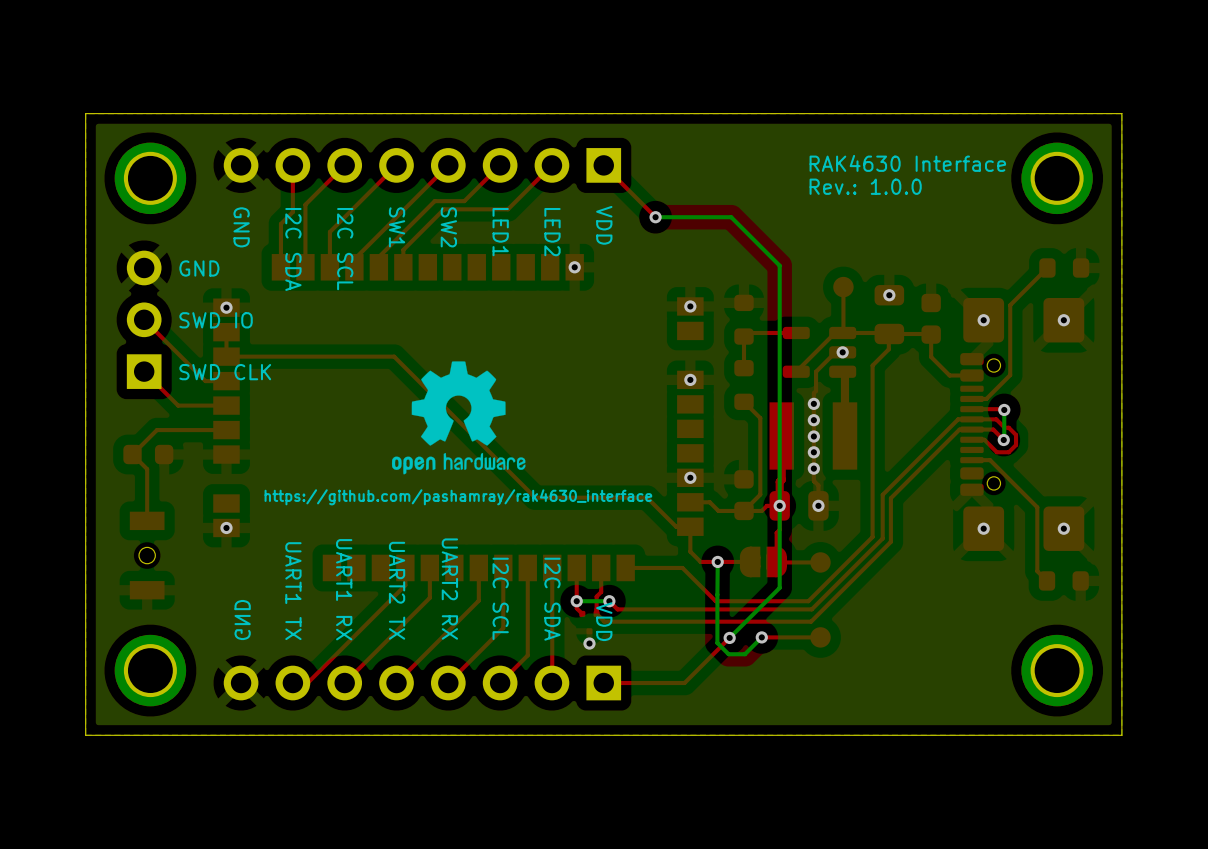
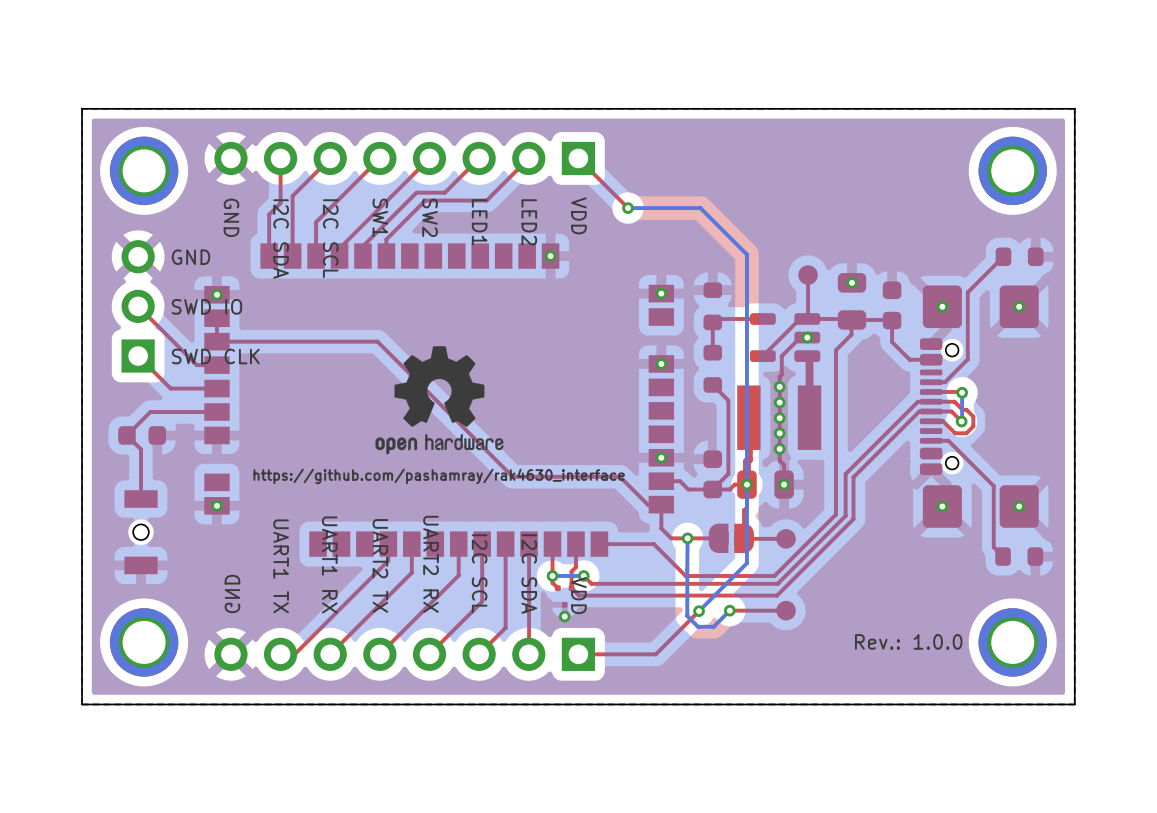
text: RAK4630 Interface (907, 163) -> none
text position: Rev.: 1.0.0 (865, 186) -> Rev.: 1.0.0 (908, 641)

